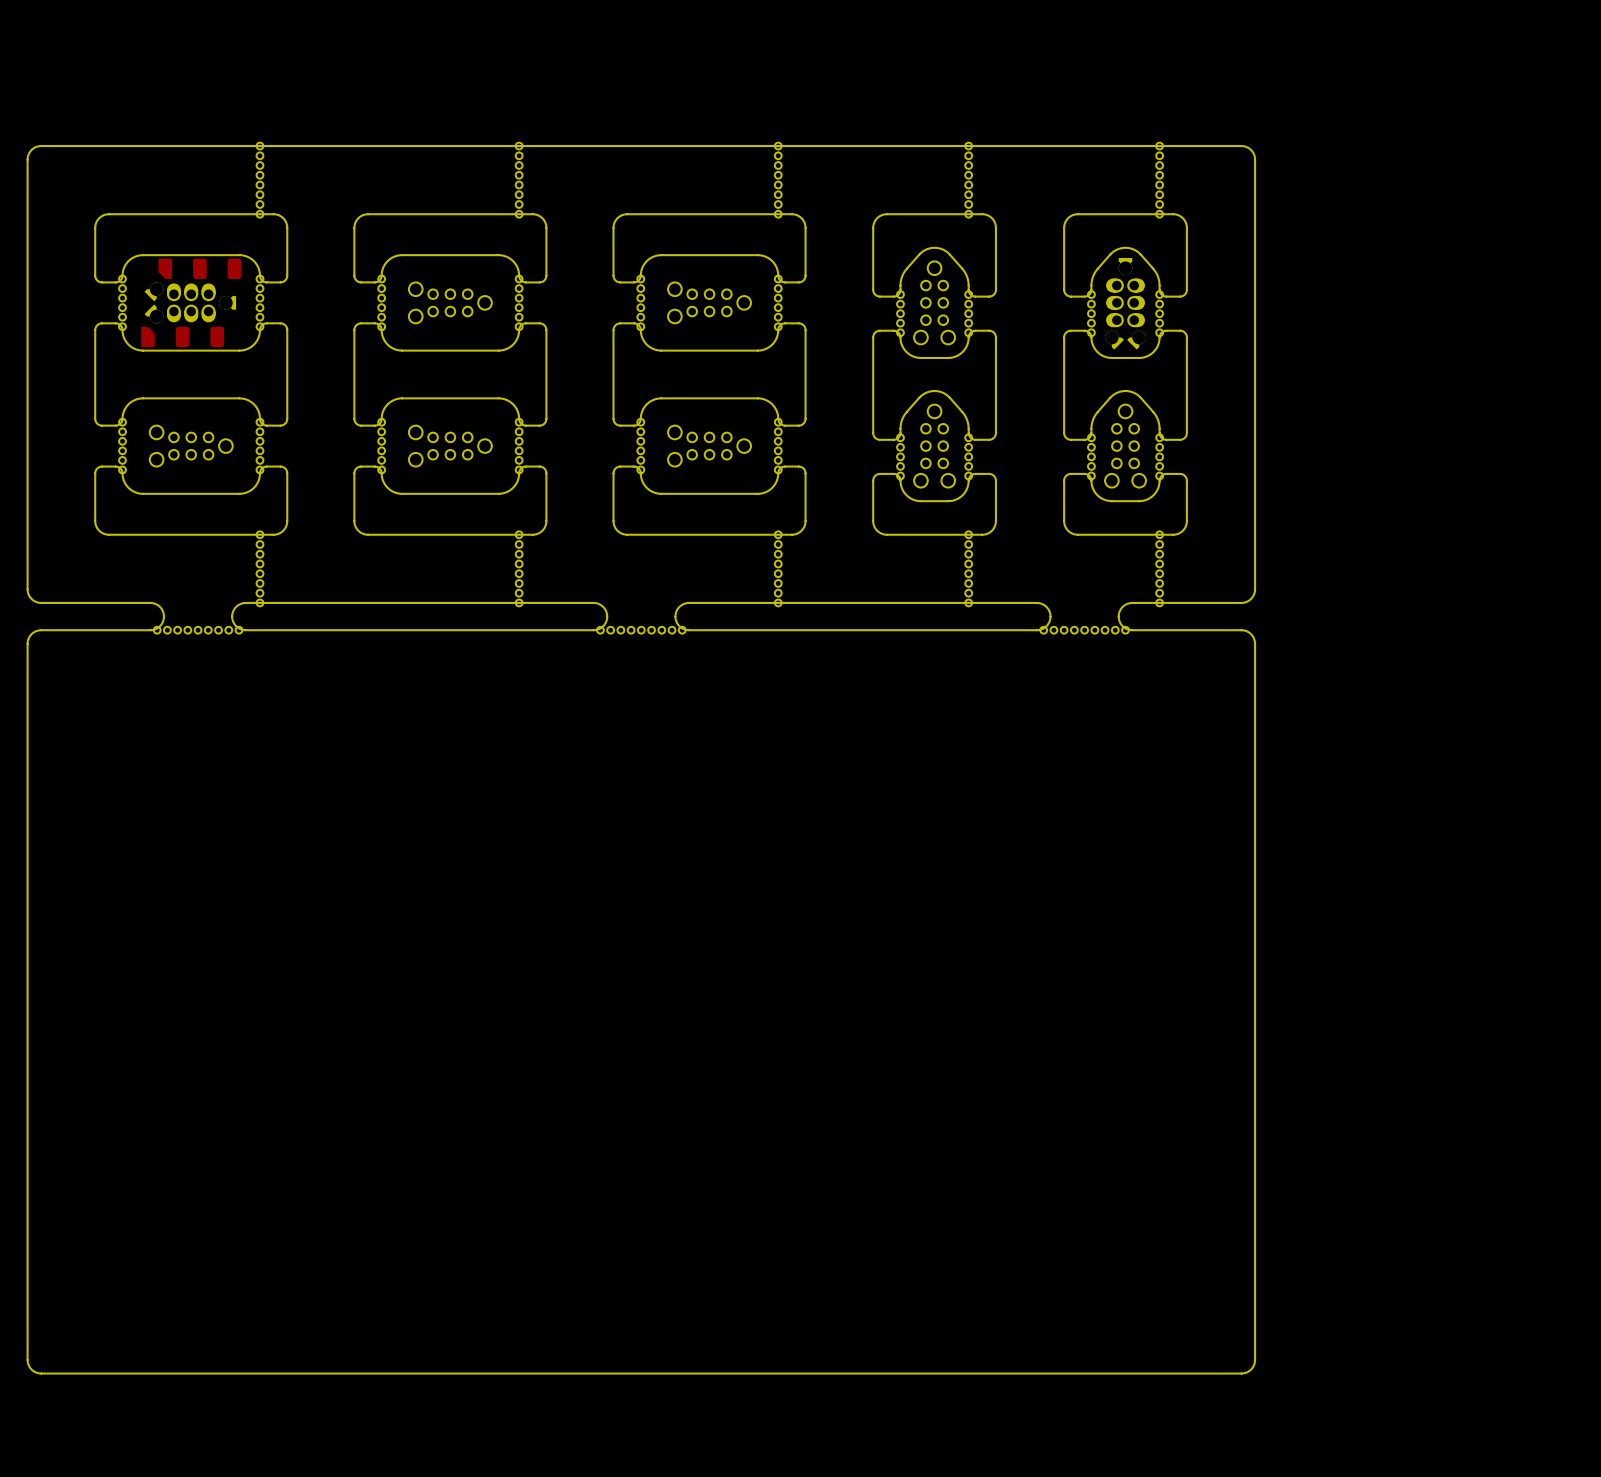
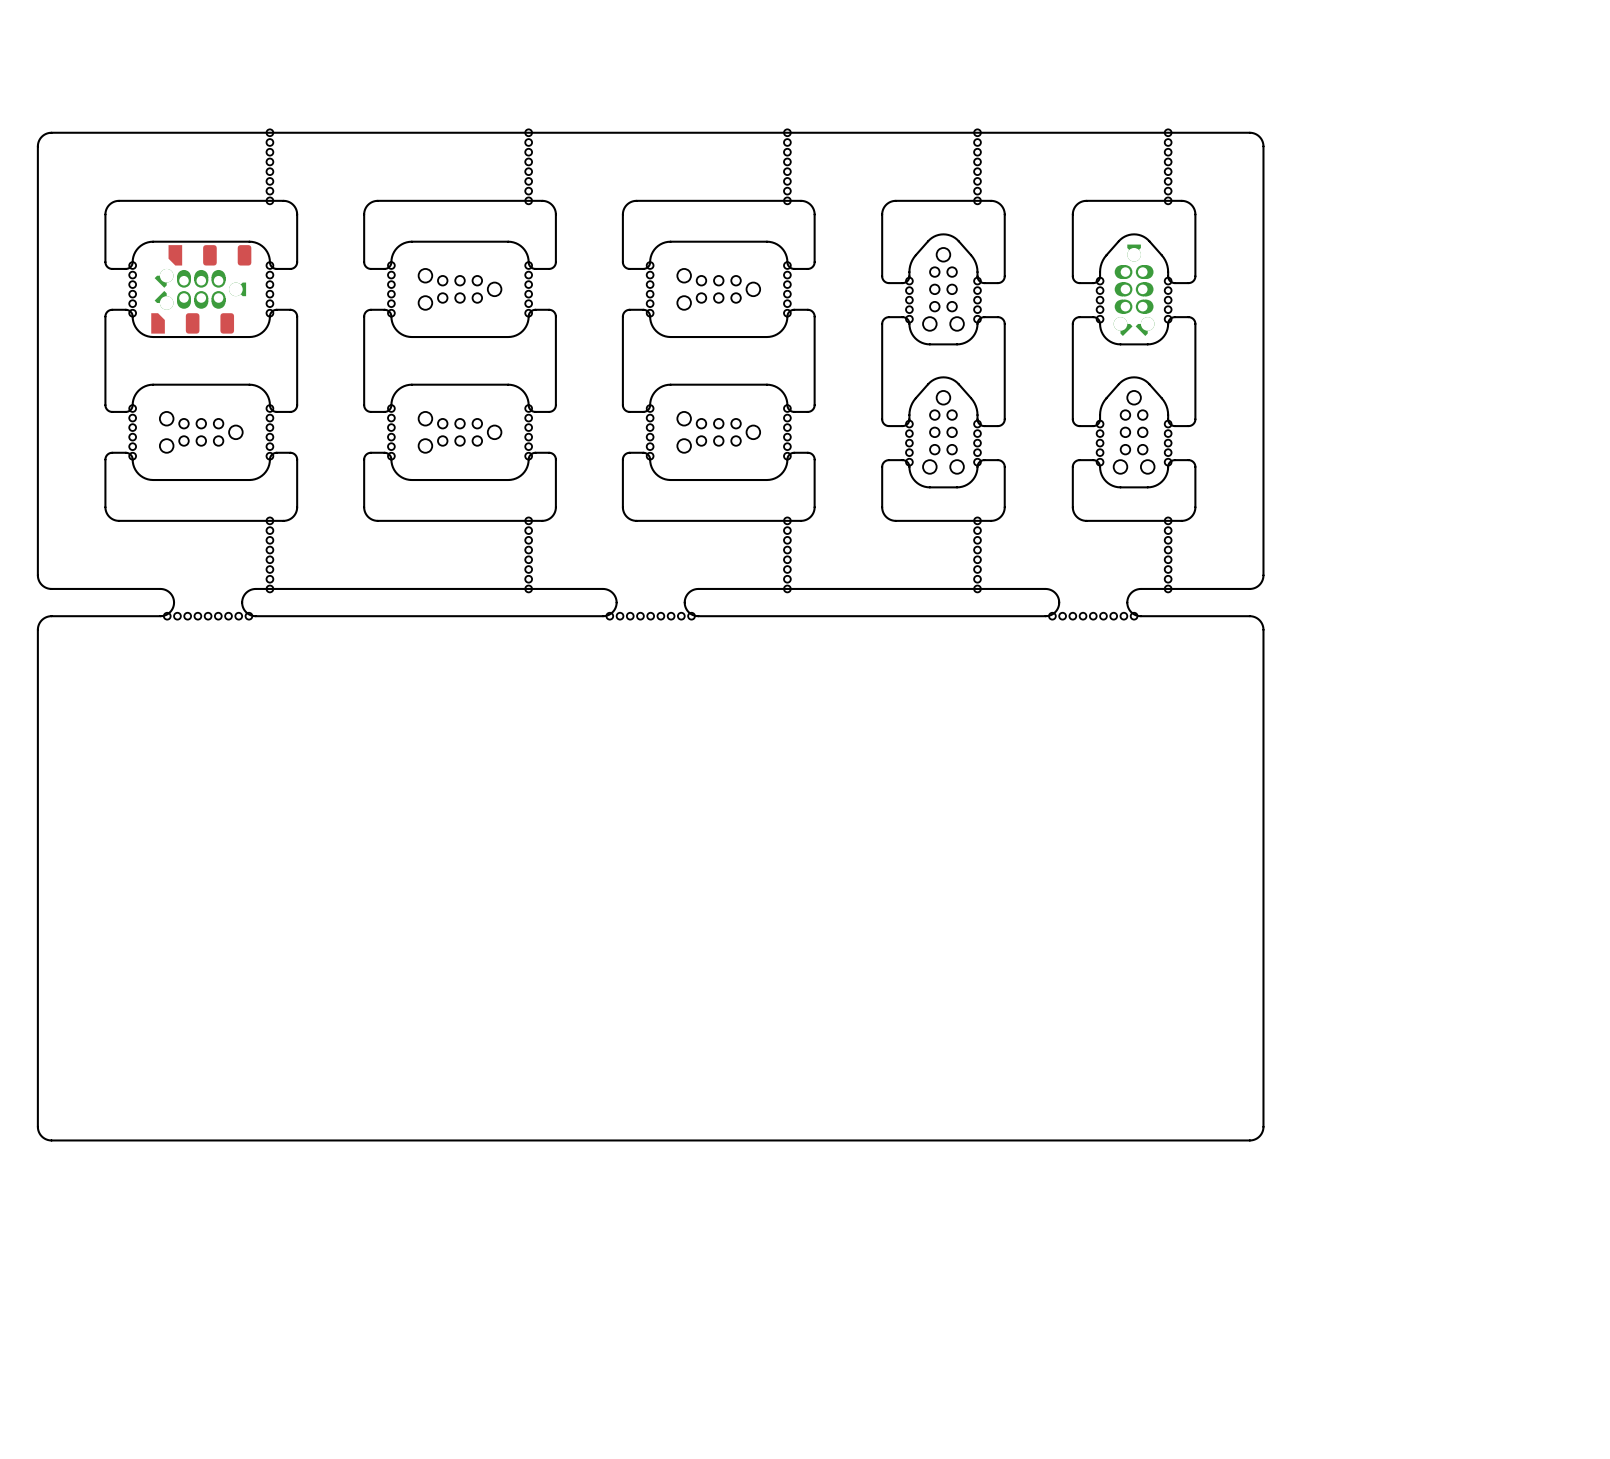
board edge: (1255, 1141) (1254, 1361) (1249, 1370) (1241, 1373) (39, 1373) (30, 1368) (27, 1359) (27, 1141) -> (1263, 1126) (1259, 1136) (1249, 1140) (51, 1140) (41, 1136) (37, 1126)

